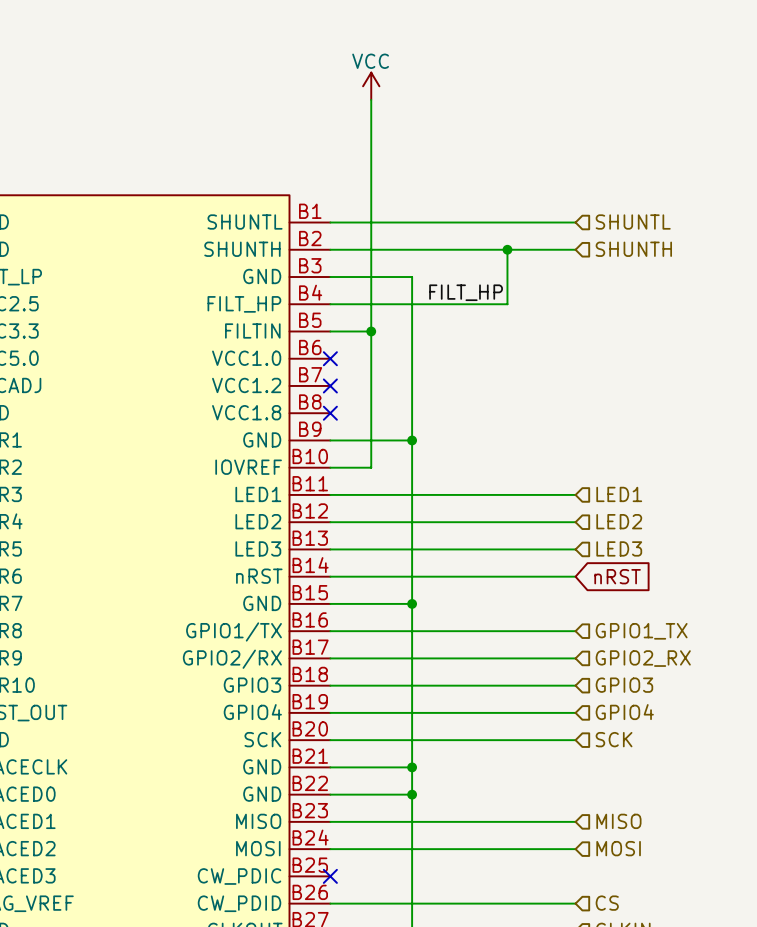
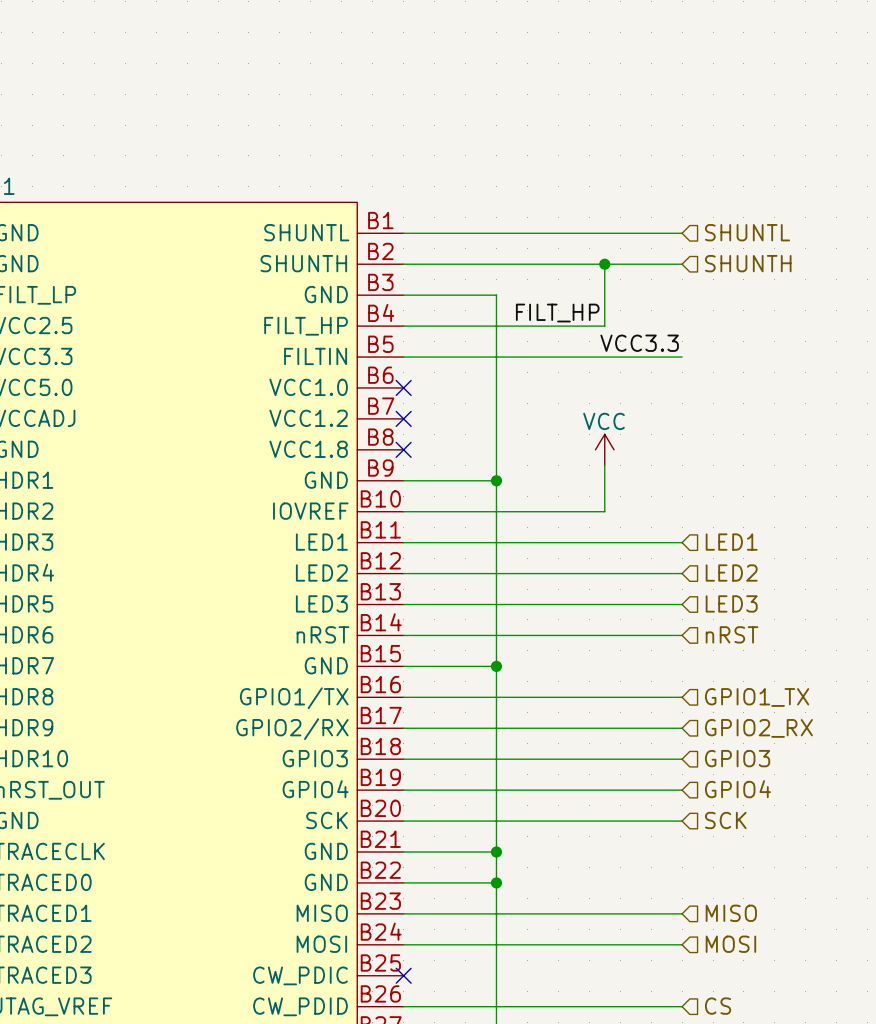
power symbol: VCC (371, 86) -> none
wire: (371, 99) (371, 467) -> (604, 465) (604, 511) (450, 511)
label: none -> VCC3.3 (639, 343)
wire: none -> (450, 357) (682, 357)
junction: (371, 331) -> none
power symbol: none -> VCC (604, 449)
global label: nRST (617, 576) -> none
hierarchical label: none -> nRST (732, 634)

